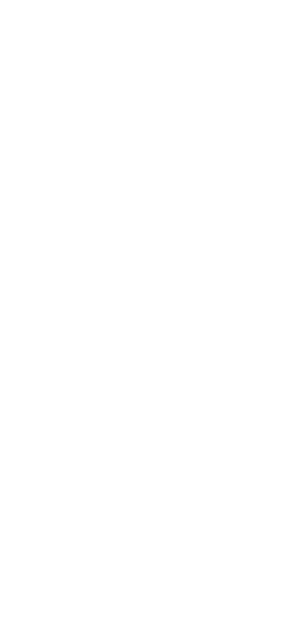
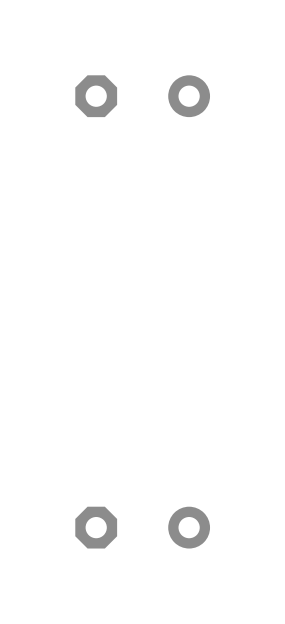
part: none -> (142, 96)
part: none -> (142, 527)

